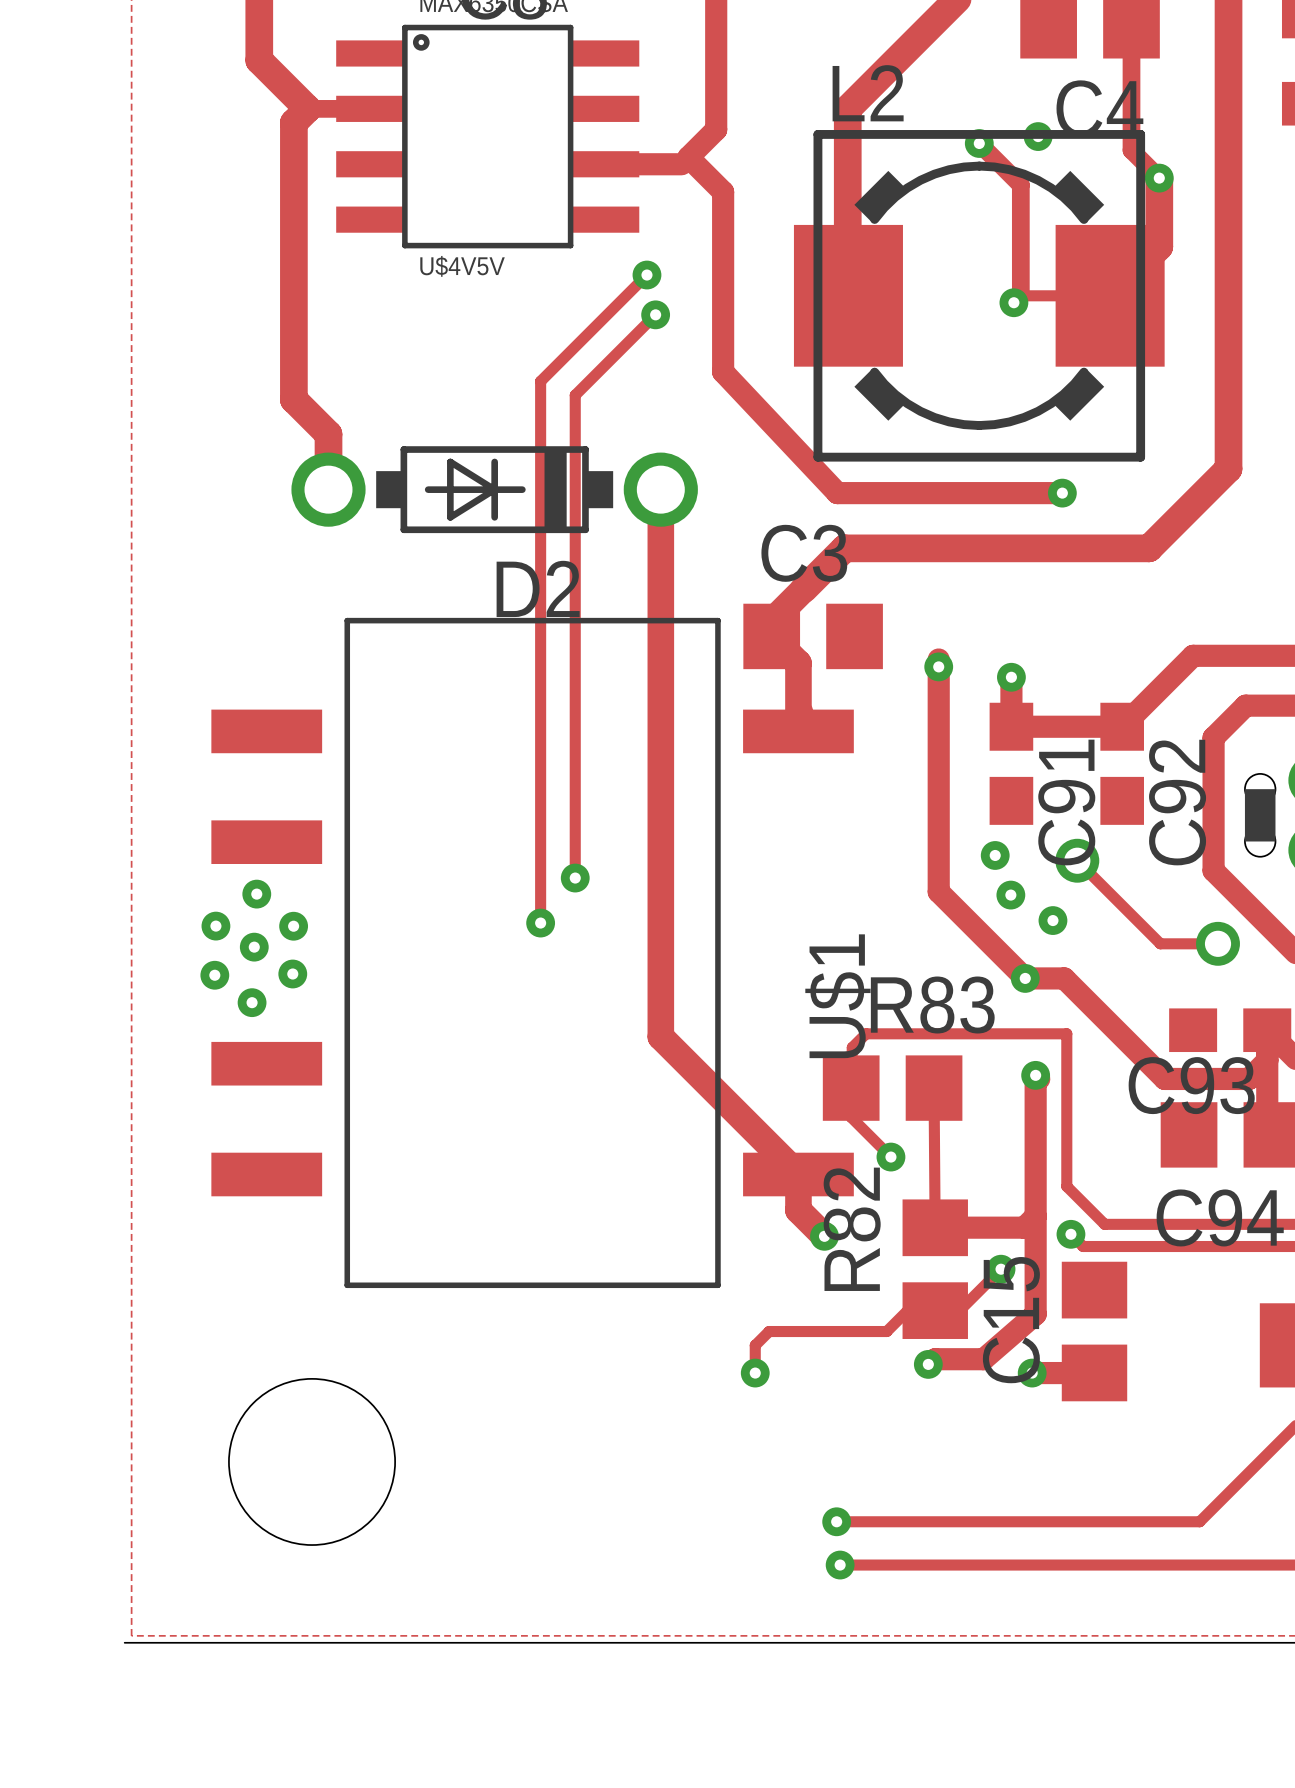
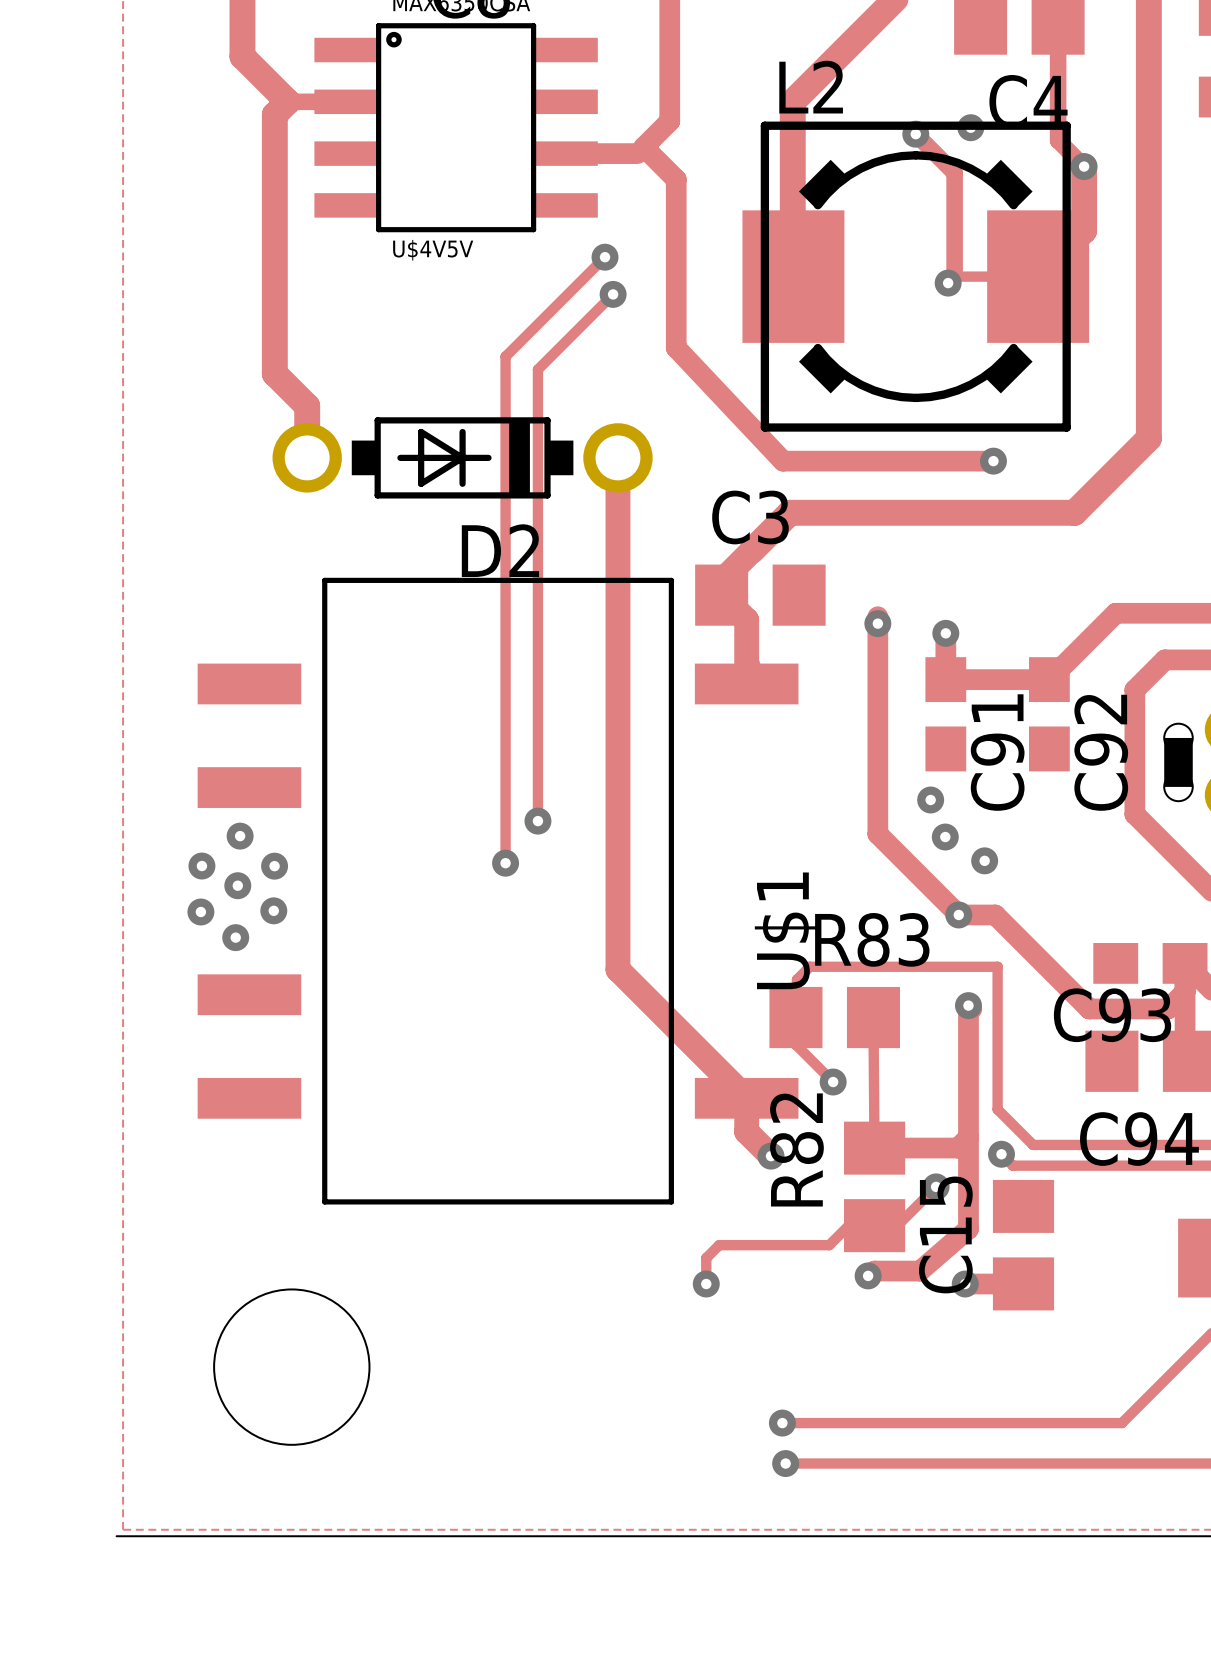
track: (1077, 860) (1160, 943) (1218, 943) -> none
via: (1077, 860) -> none
via: (1218, 943) -> none

